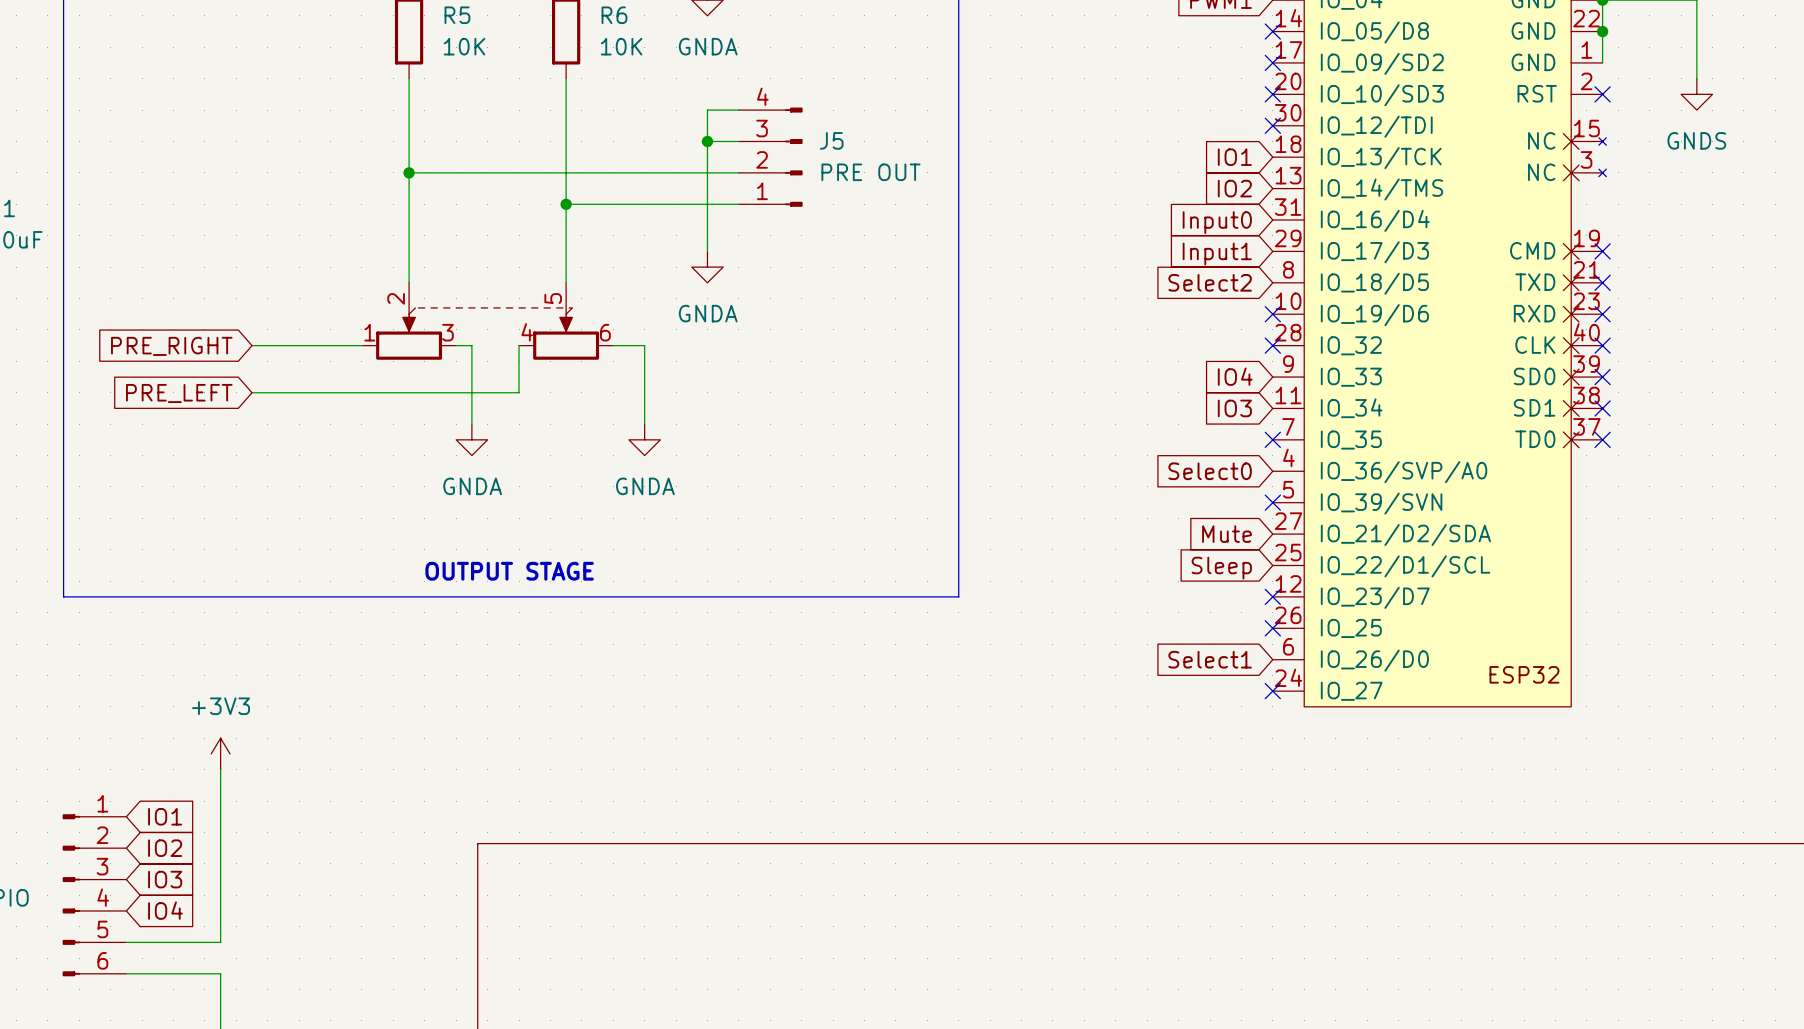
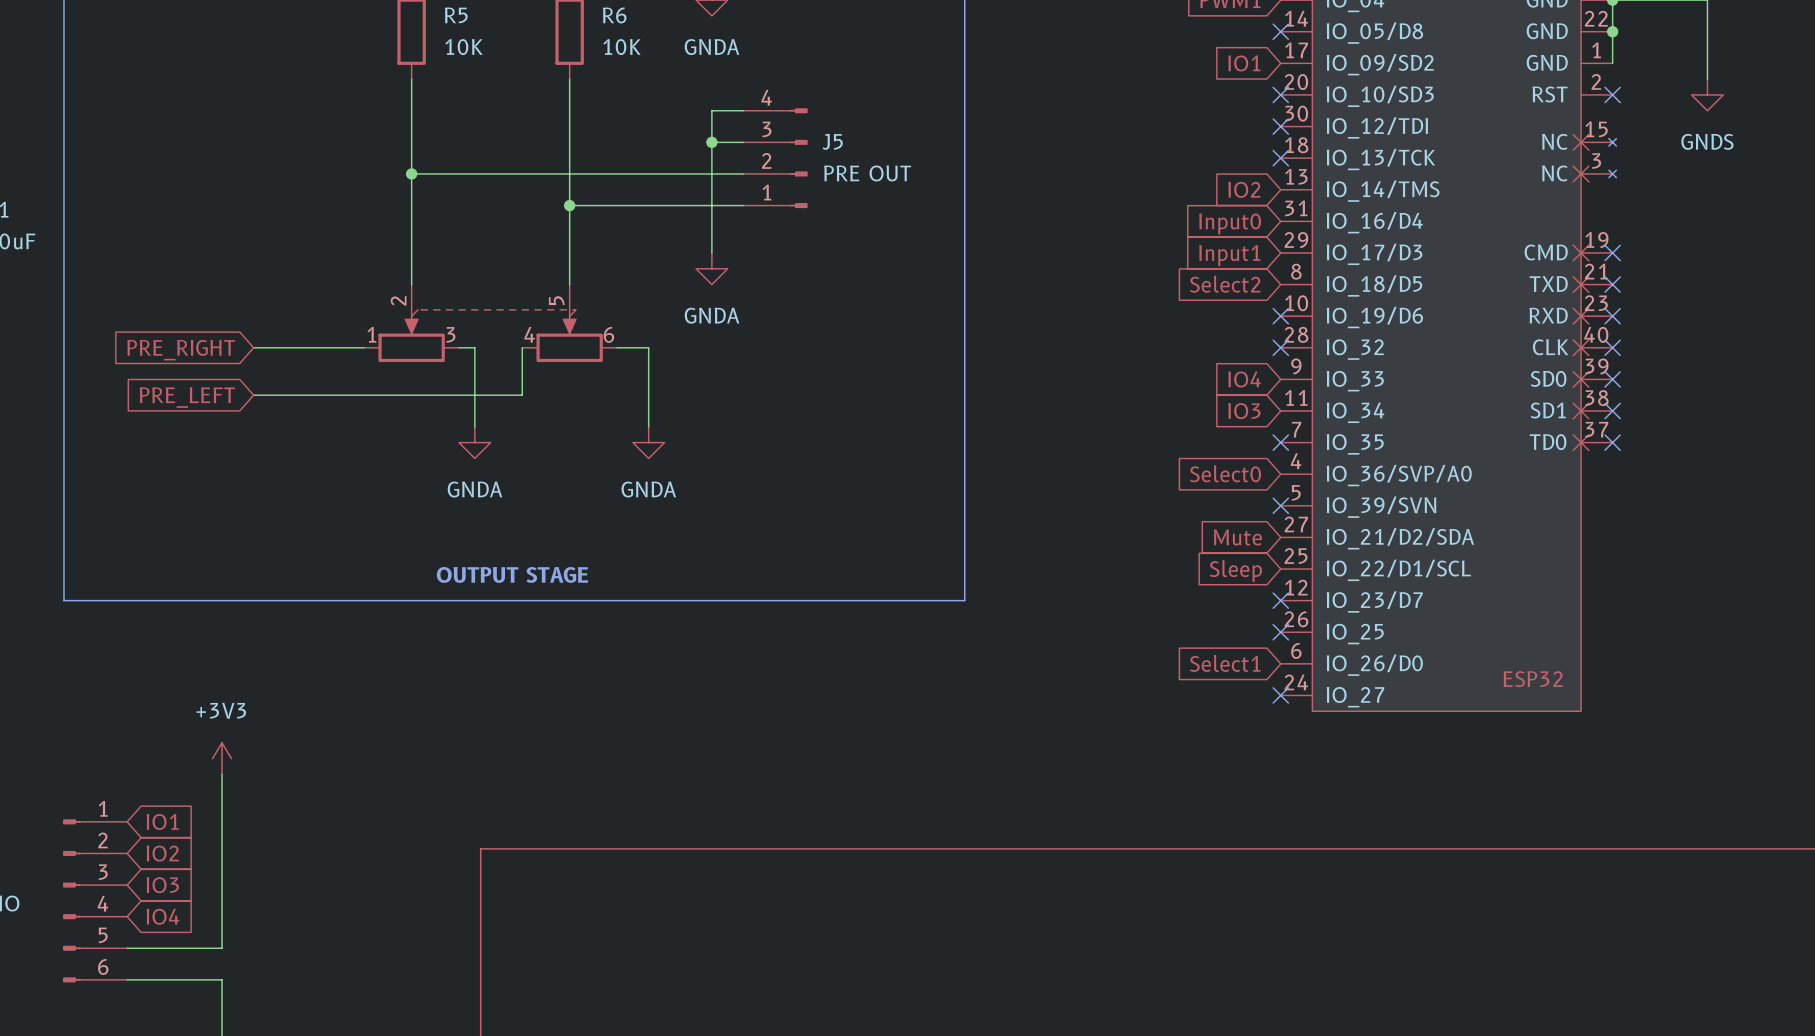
no-connect mark: (1272, 62) -> none
global label position: IO1 (1234, 157) -> IO1 (1244, 63)
no-connect mark: none -> (1280, 158)

